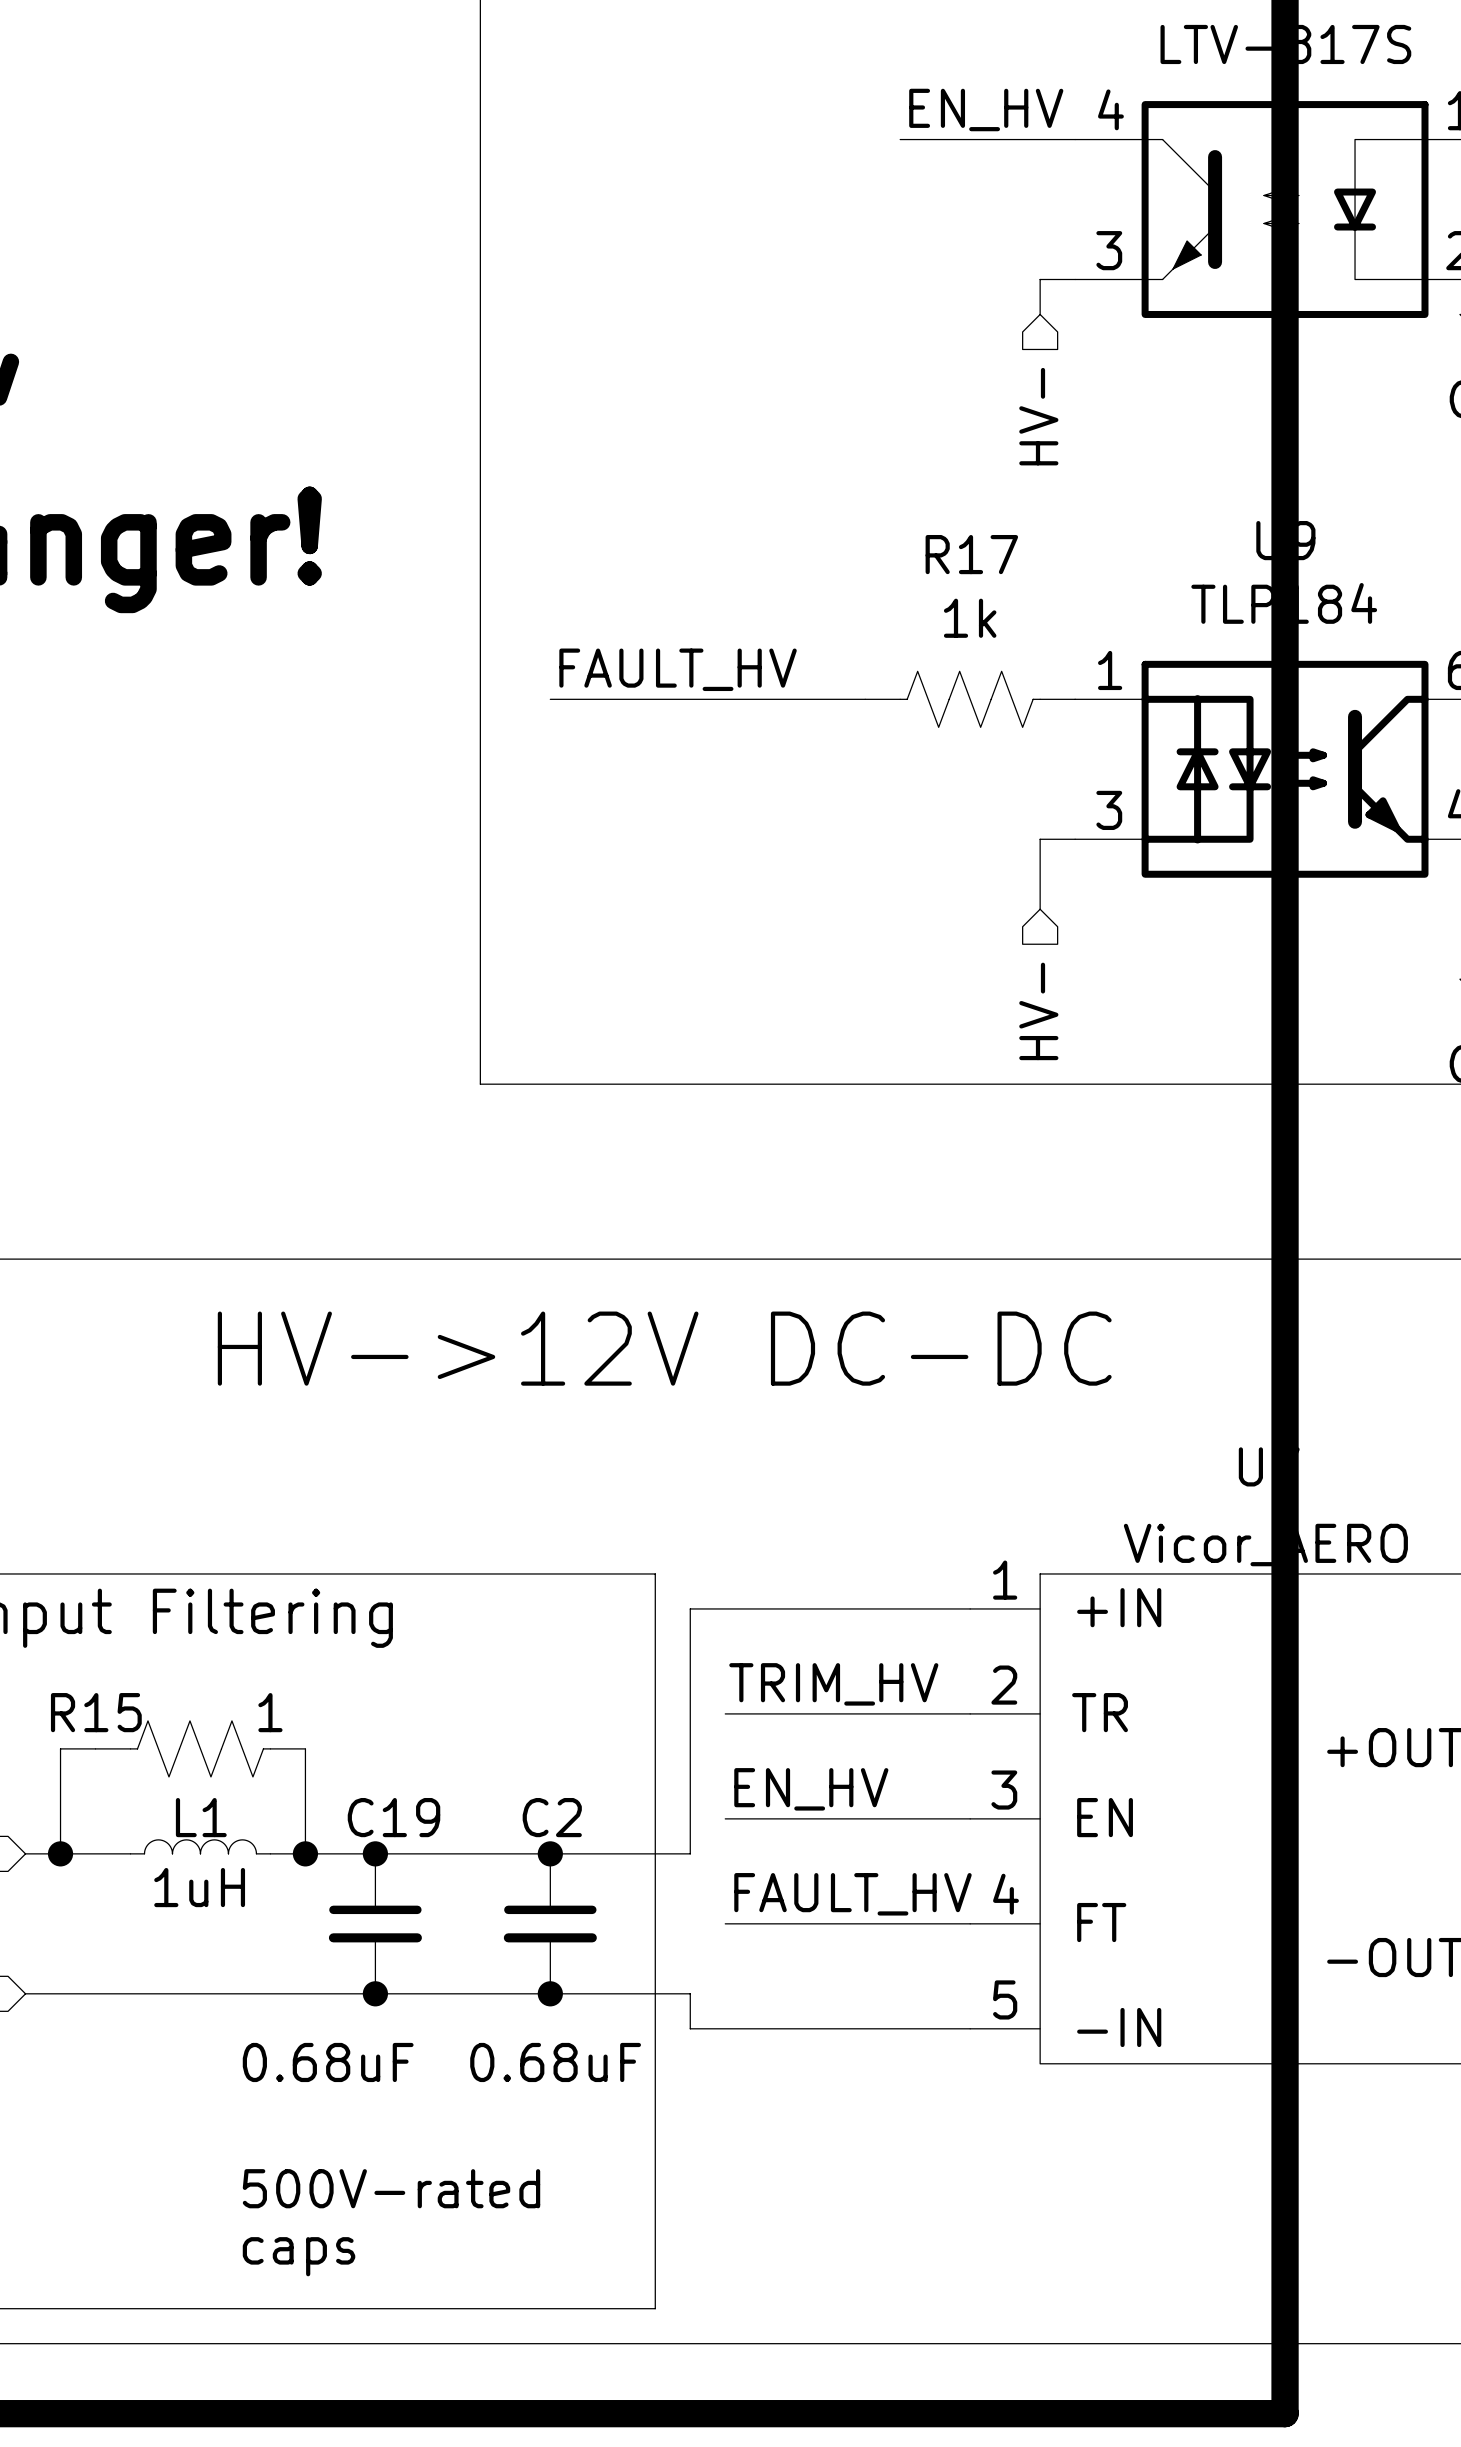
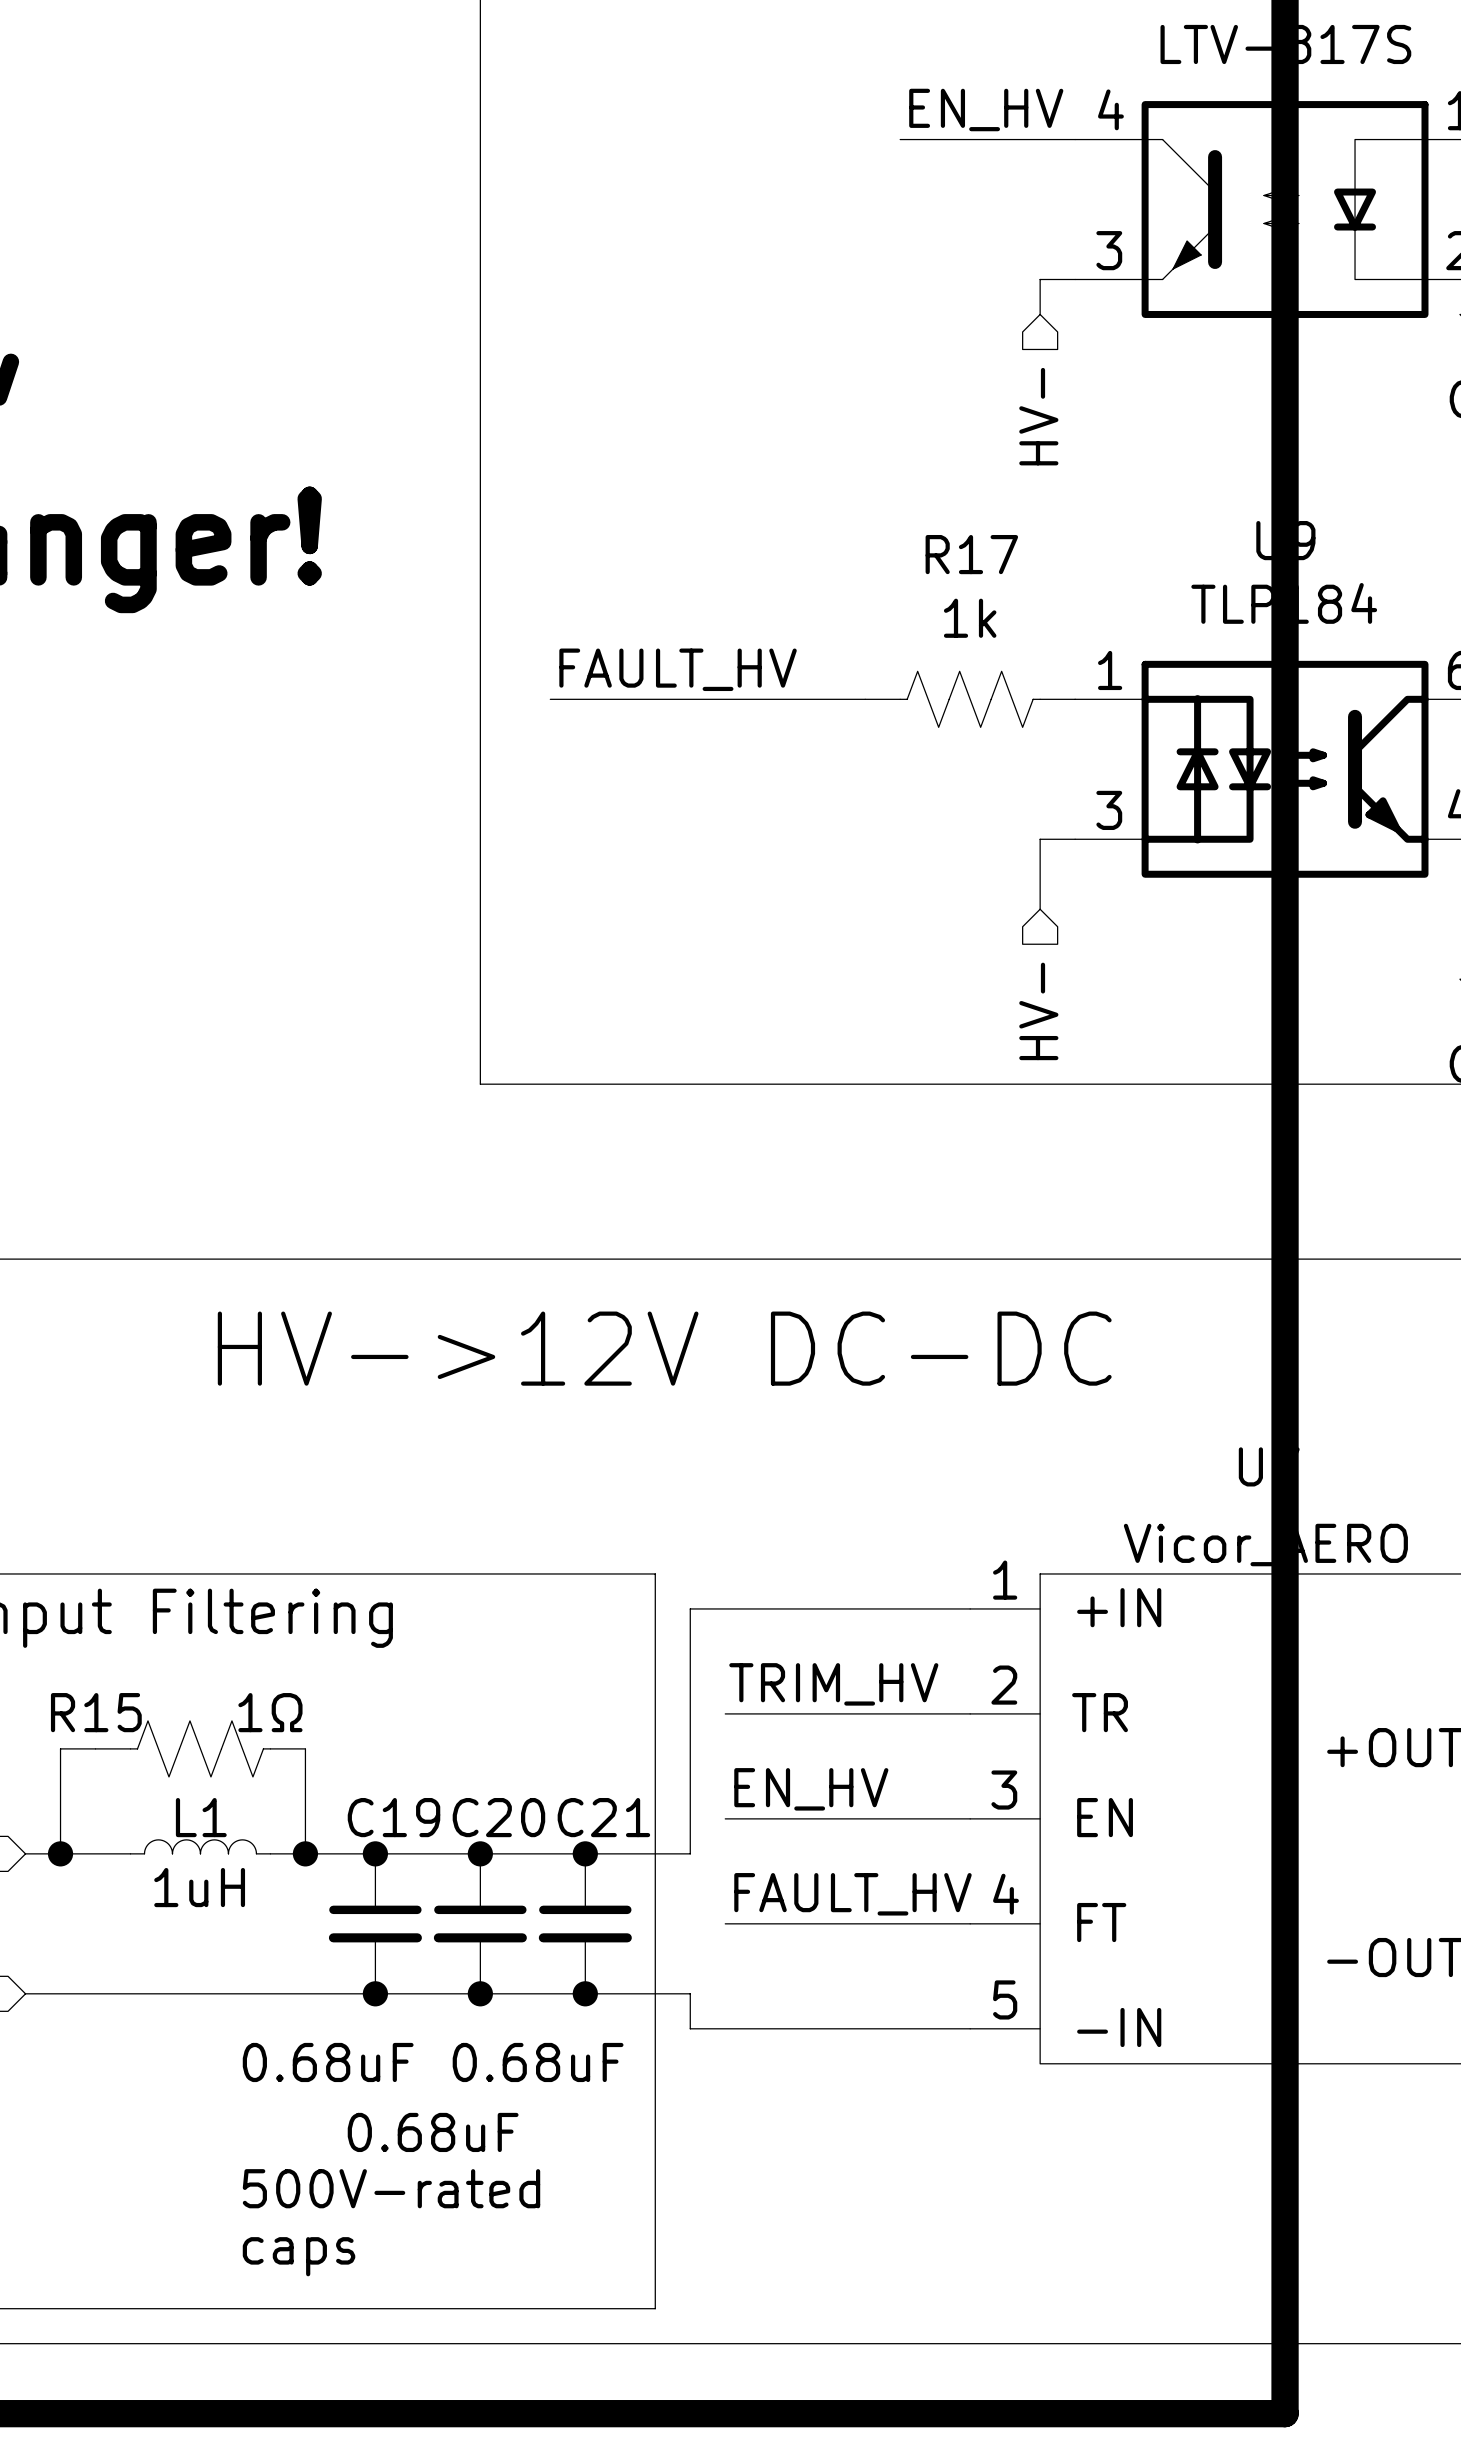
R15 value: 1 (270, 1712) -> 1Ω (270, 1712)
junction: none -> (480, 1853)
junction: (550, 1853) -> none
junction: none -> (585, 1853)
C20: none -> 0.68uF (480, 1923)
C2: 0.68uF (550, 1923) -> none
C21: none -> 0.68uF (585, 1923)
junction: none -> (480, 1993)
junction: (550, 1993) -> none
junction: none -> (585, 1993)

